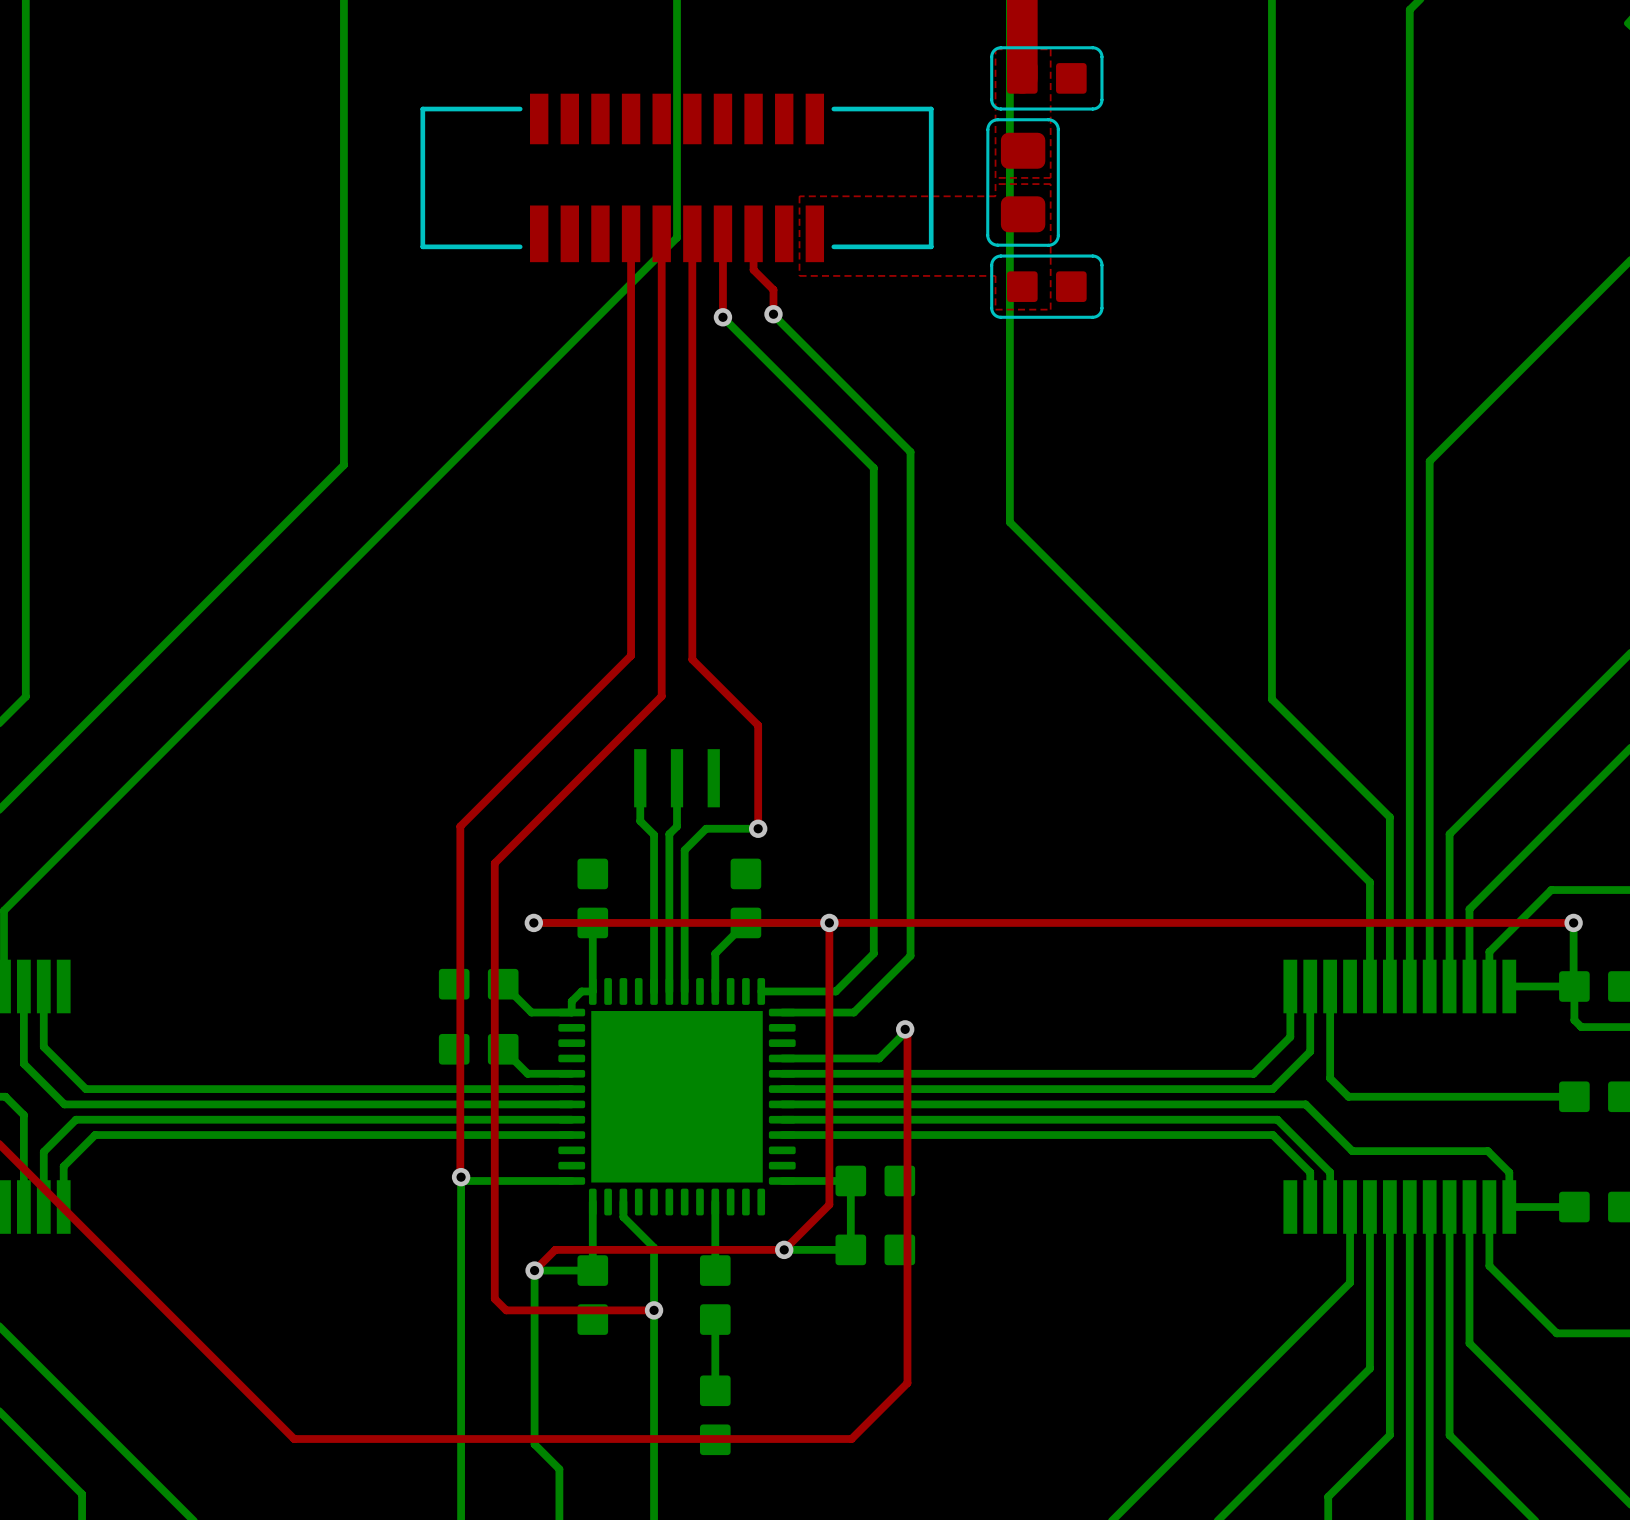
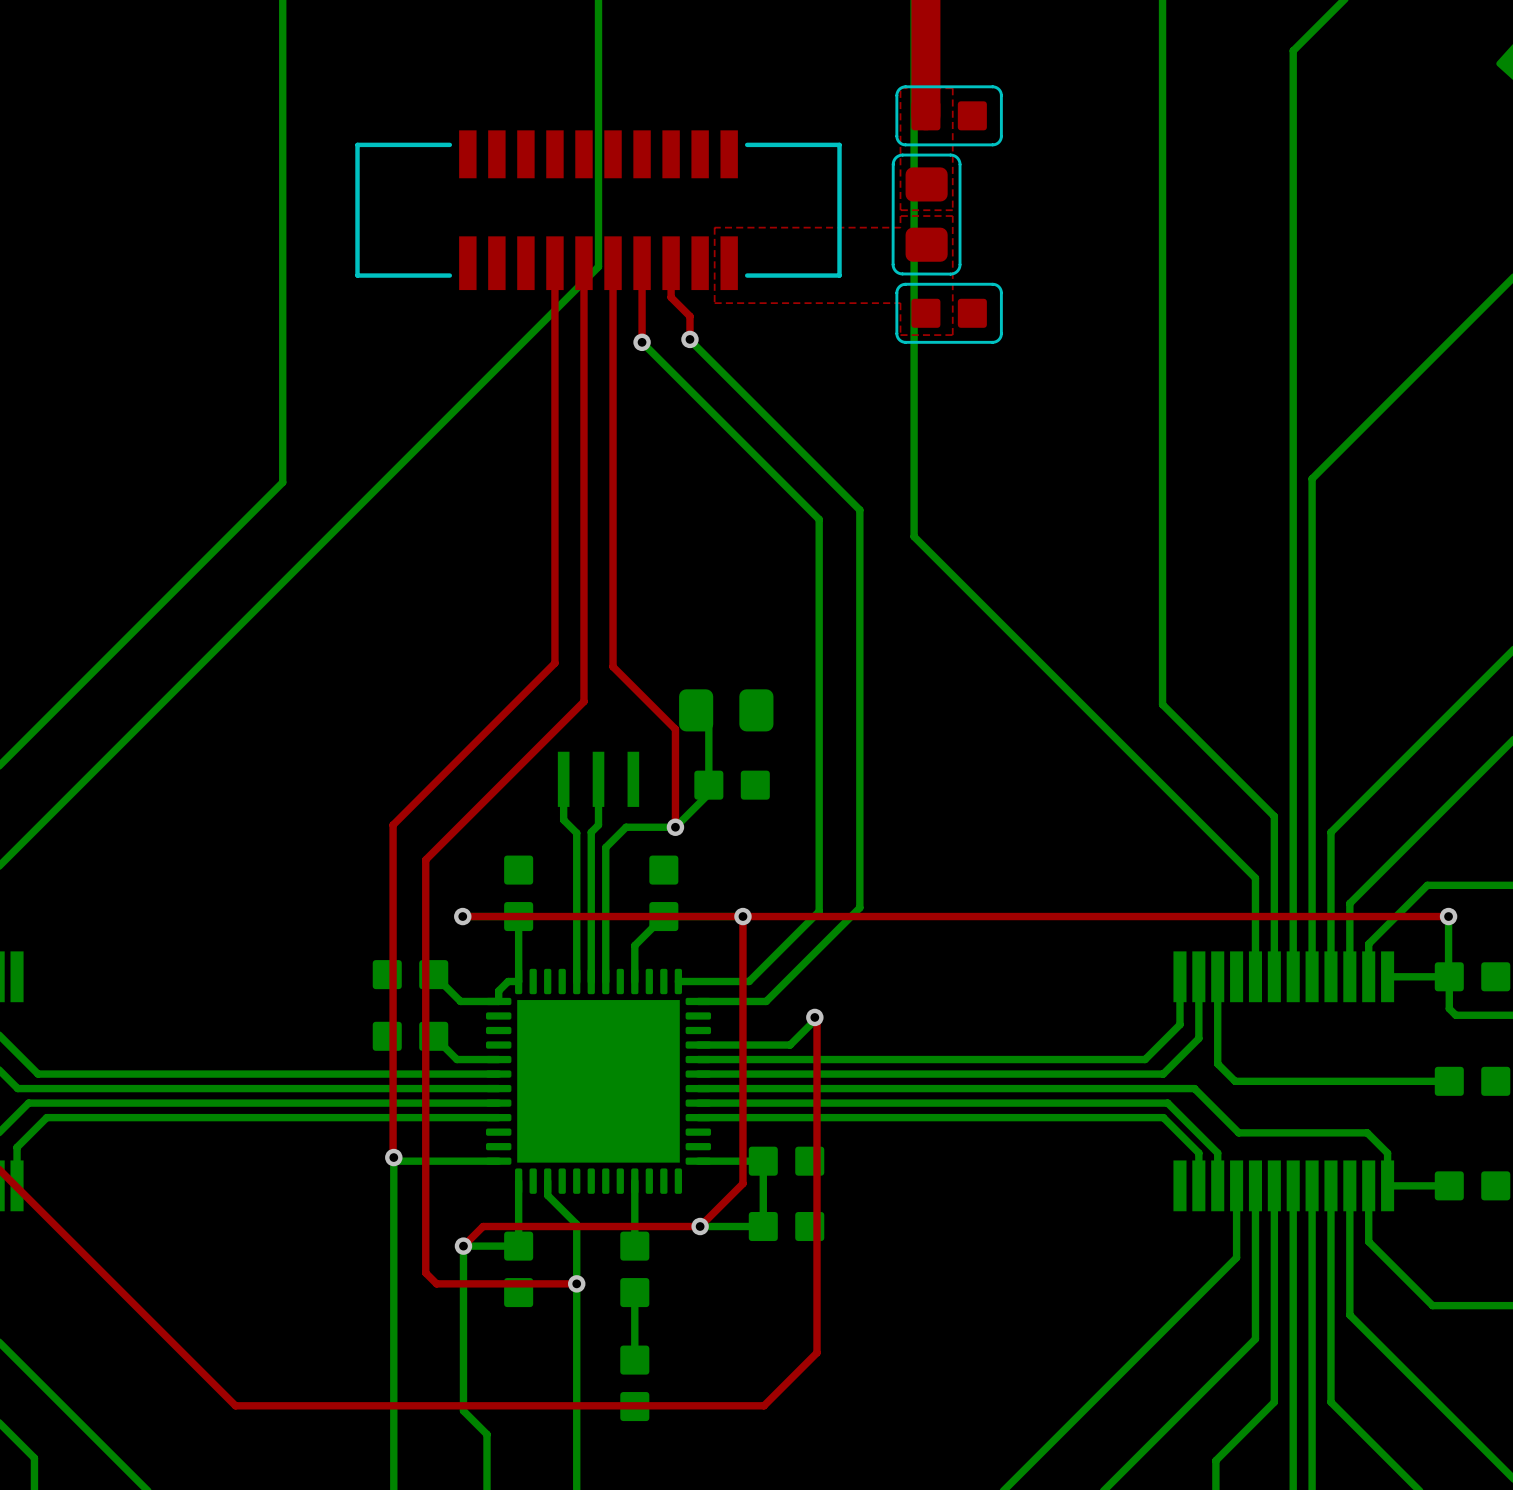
bottom track: (910, 452) (910, 955) -> (819, 470) (859, 510) (859, 907) (819, 947)
bottom track: (873, 468) (873, 953) -> (785, 485) (819, 519) (819, 911) (785, 945)
bottom track: none -> (696, 710) (708, 723) (708, 793) (675, 827)
part: none -> (726, 710)
part: none -> (732, 785)

